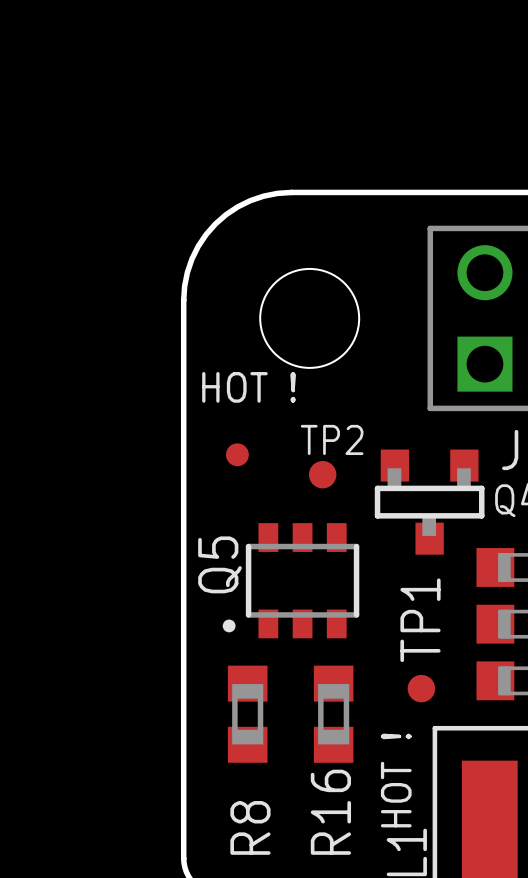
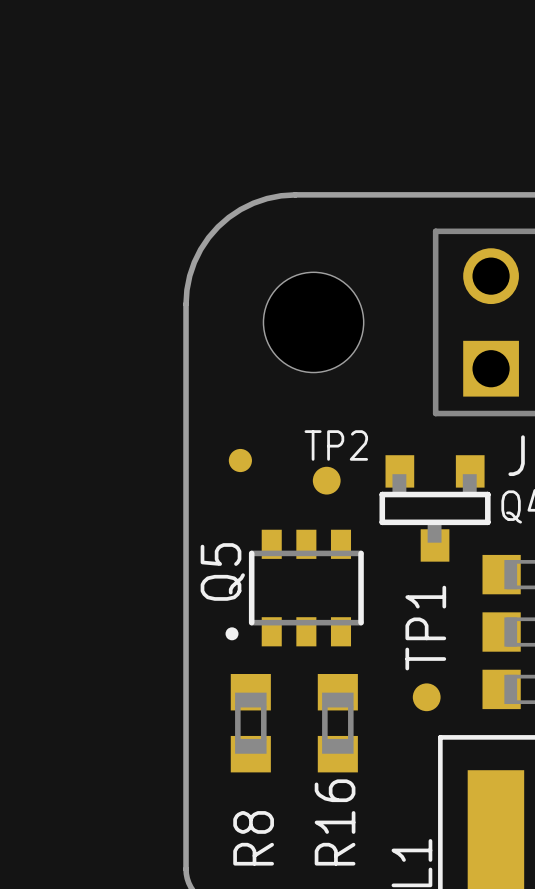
text: HOT ! (249, 387) -> none
text: HOT ! (396, 780) -> none

